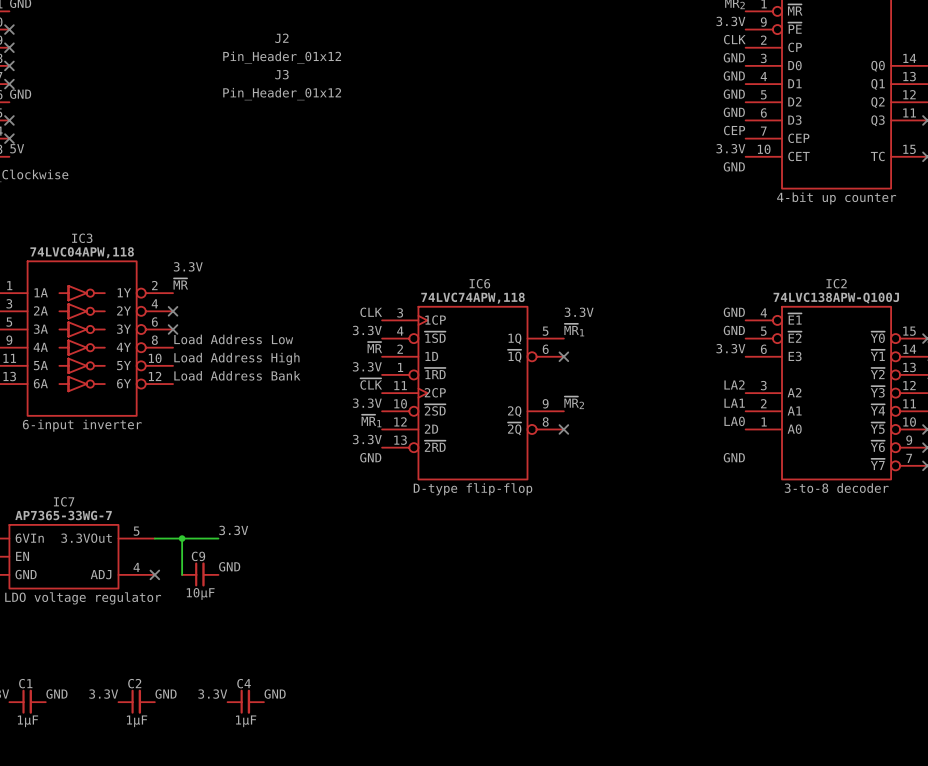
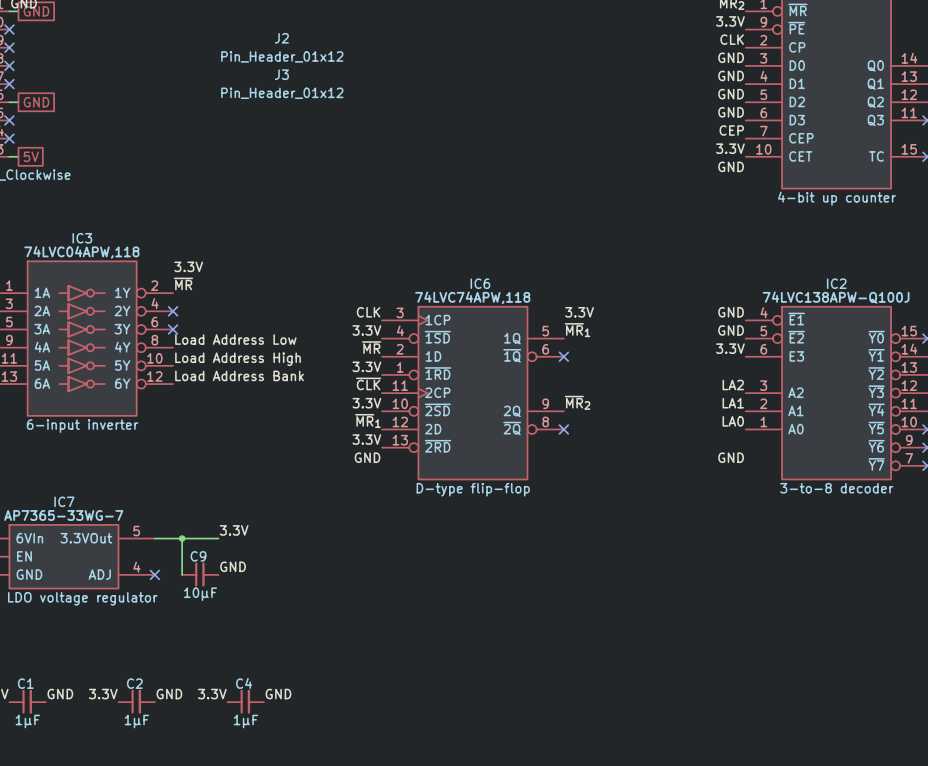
wire: none -> (9, 11) (18, 11)
global label: none -> GND (36, 11)
label: GND (20, 94) -> none
wire: none -> (9, 102) (18, 102)
global label: none -> GND (36, 102)
label: 5V (17, 148) -> none
wire: none -> (9, 156) (18, 156)
global label: none -> 5V (31, 156)

